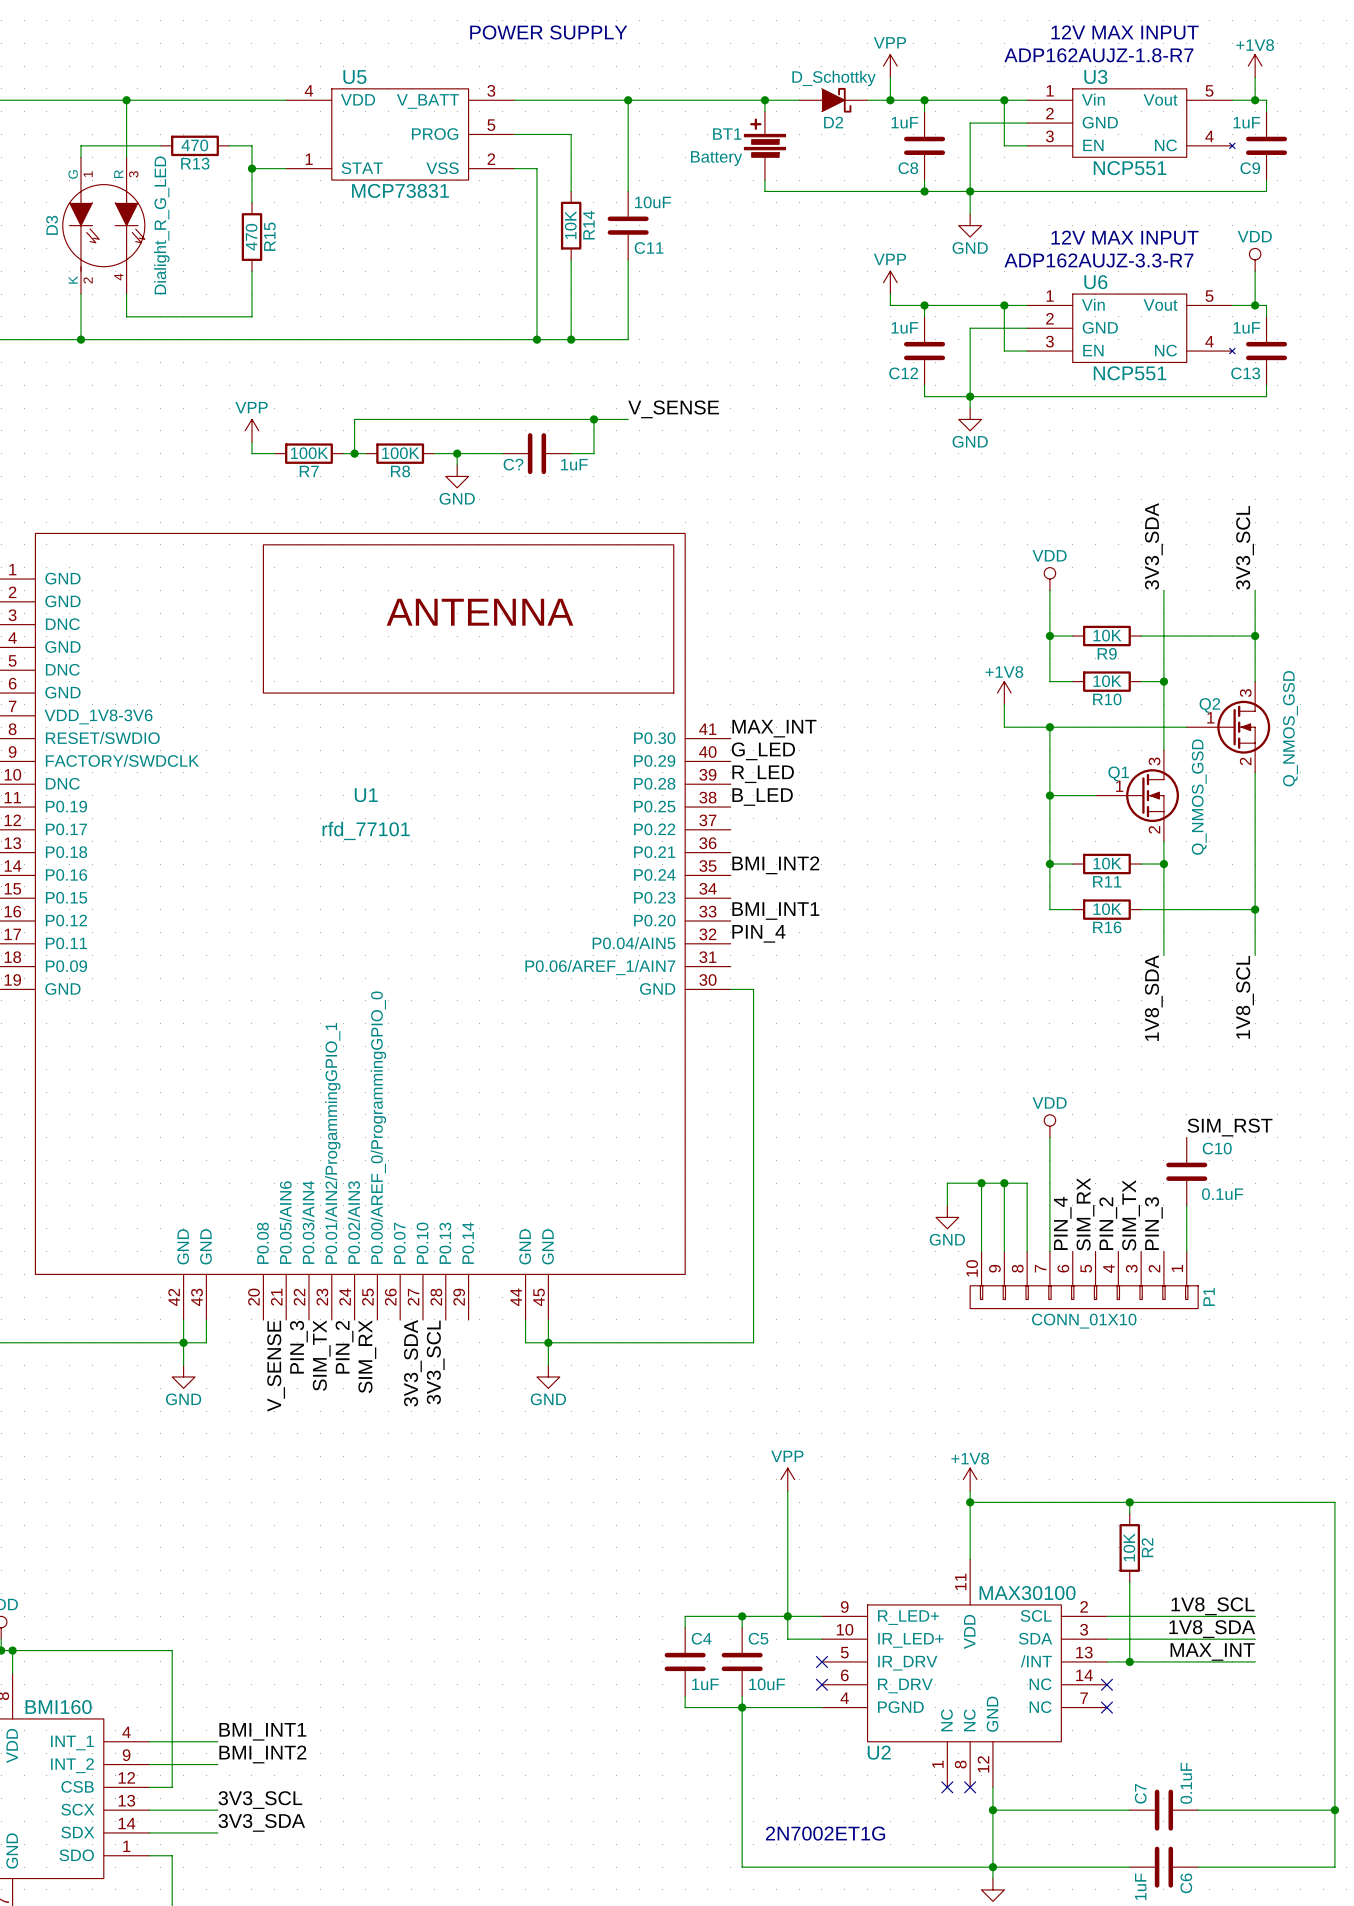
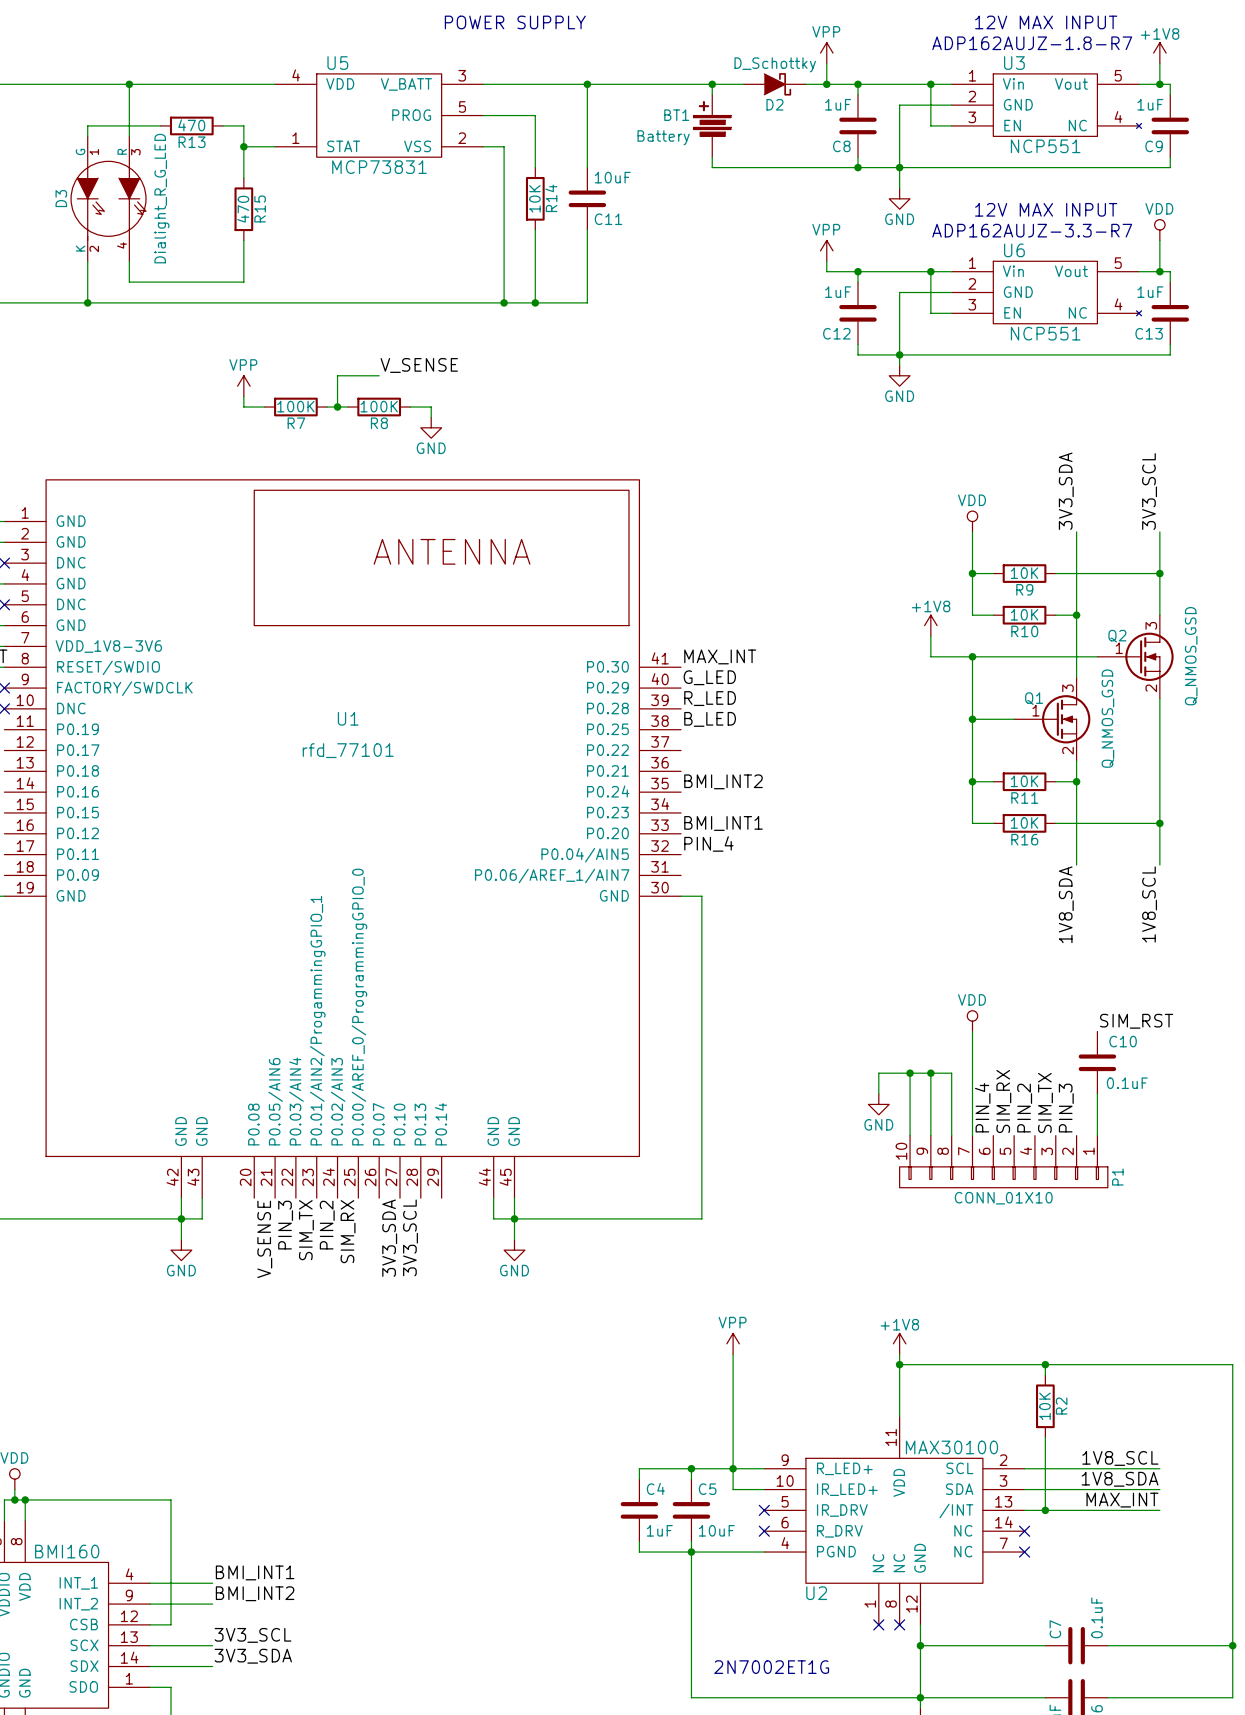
label: none -> V_SENSE (419, 365)
label: V_SENSE (673, 409) -> none
wire: (400, 419) (628, 419) -> none
wire: (593, 419) (593, 453) (571, 453) -> none
junction: (593, 419) -> none
wire: (457, 453) (502, 453) -> none
junction: (457, 453) -> none
C?: 1uF (536, 453) -> none

